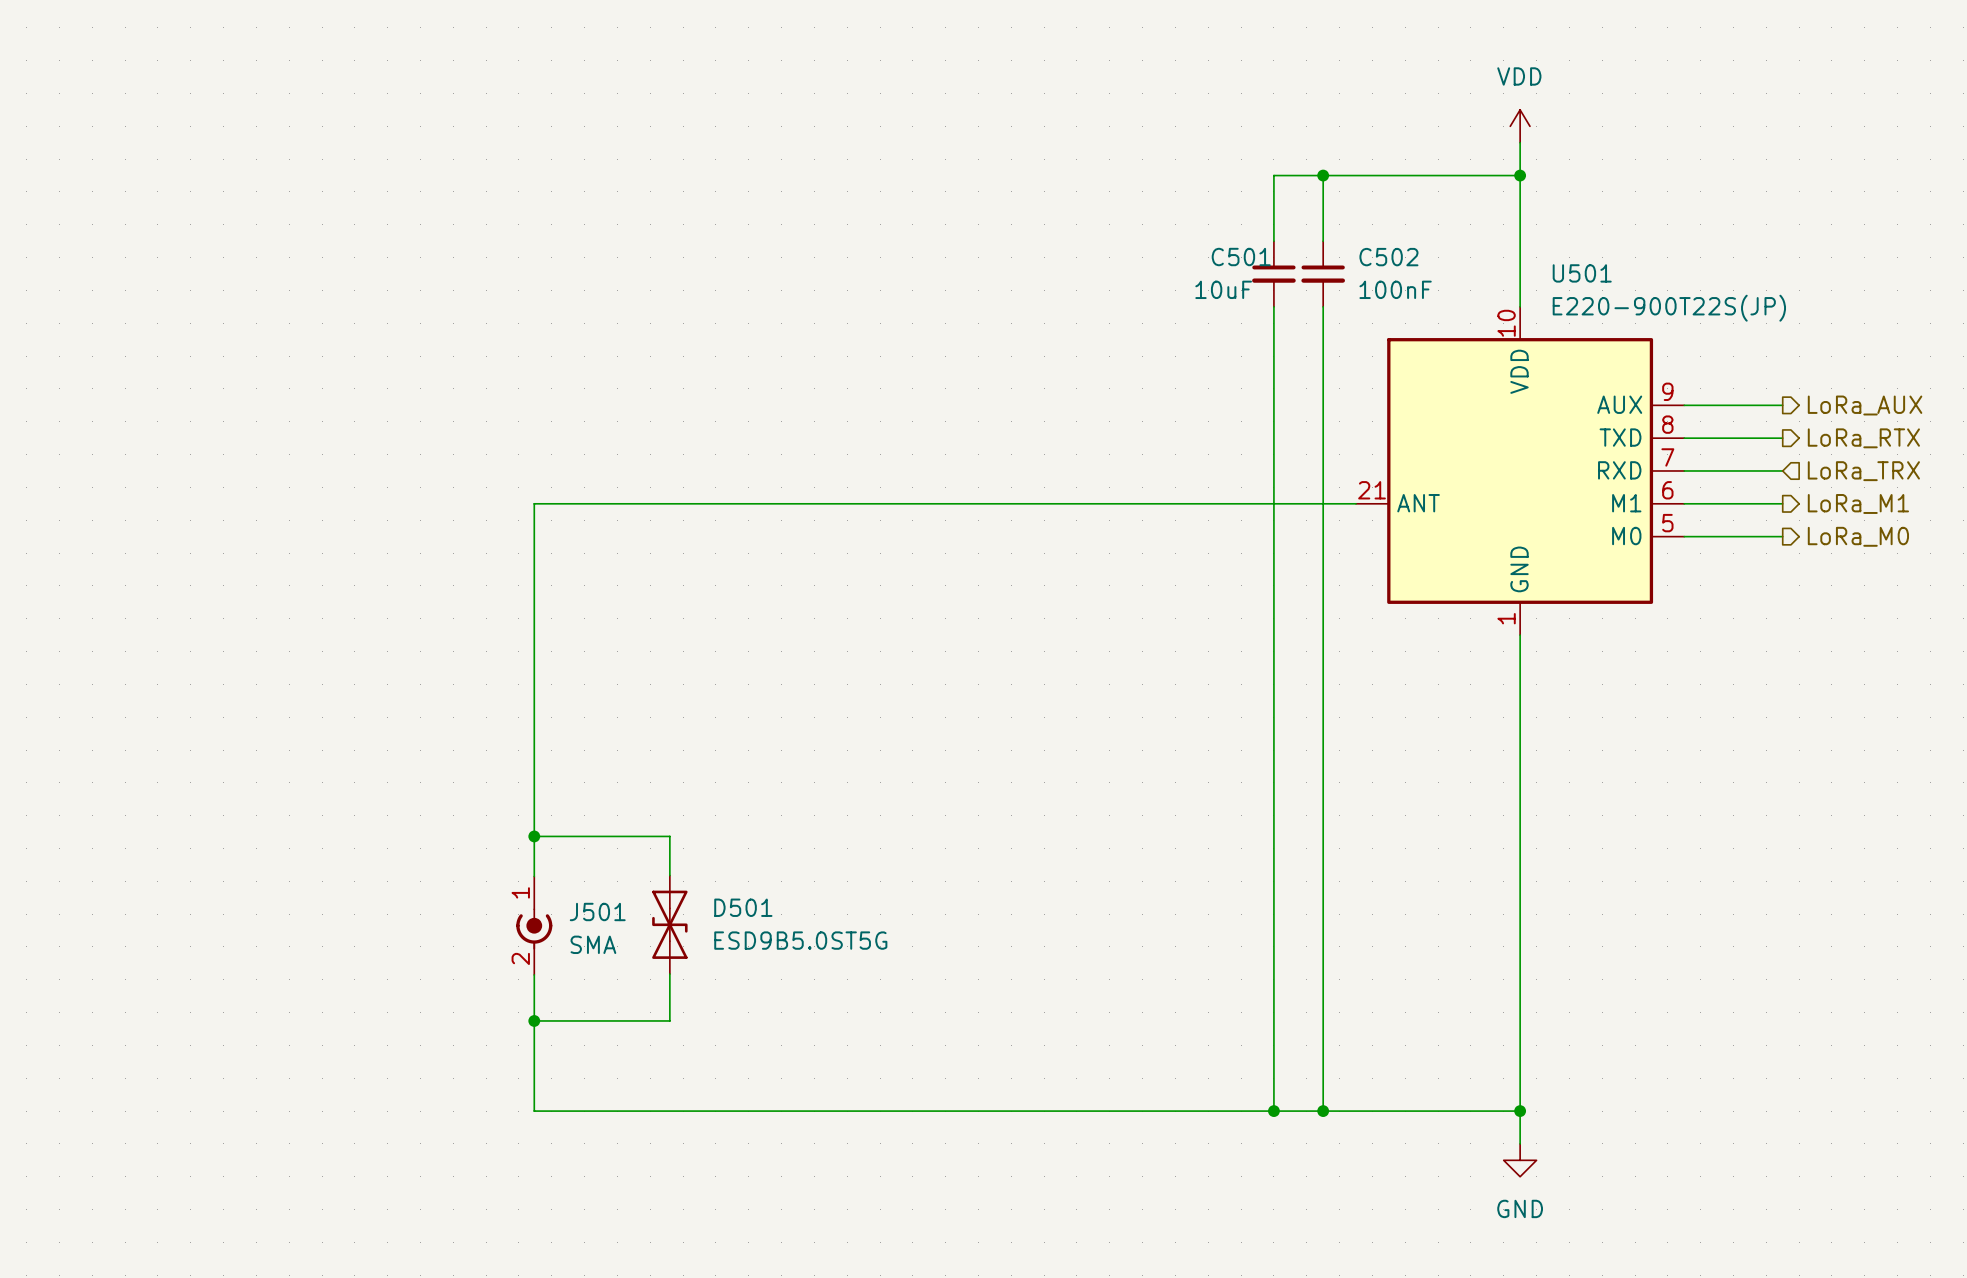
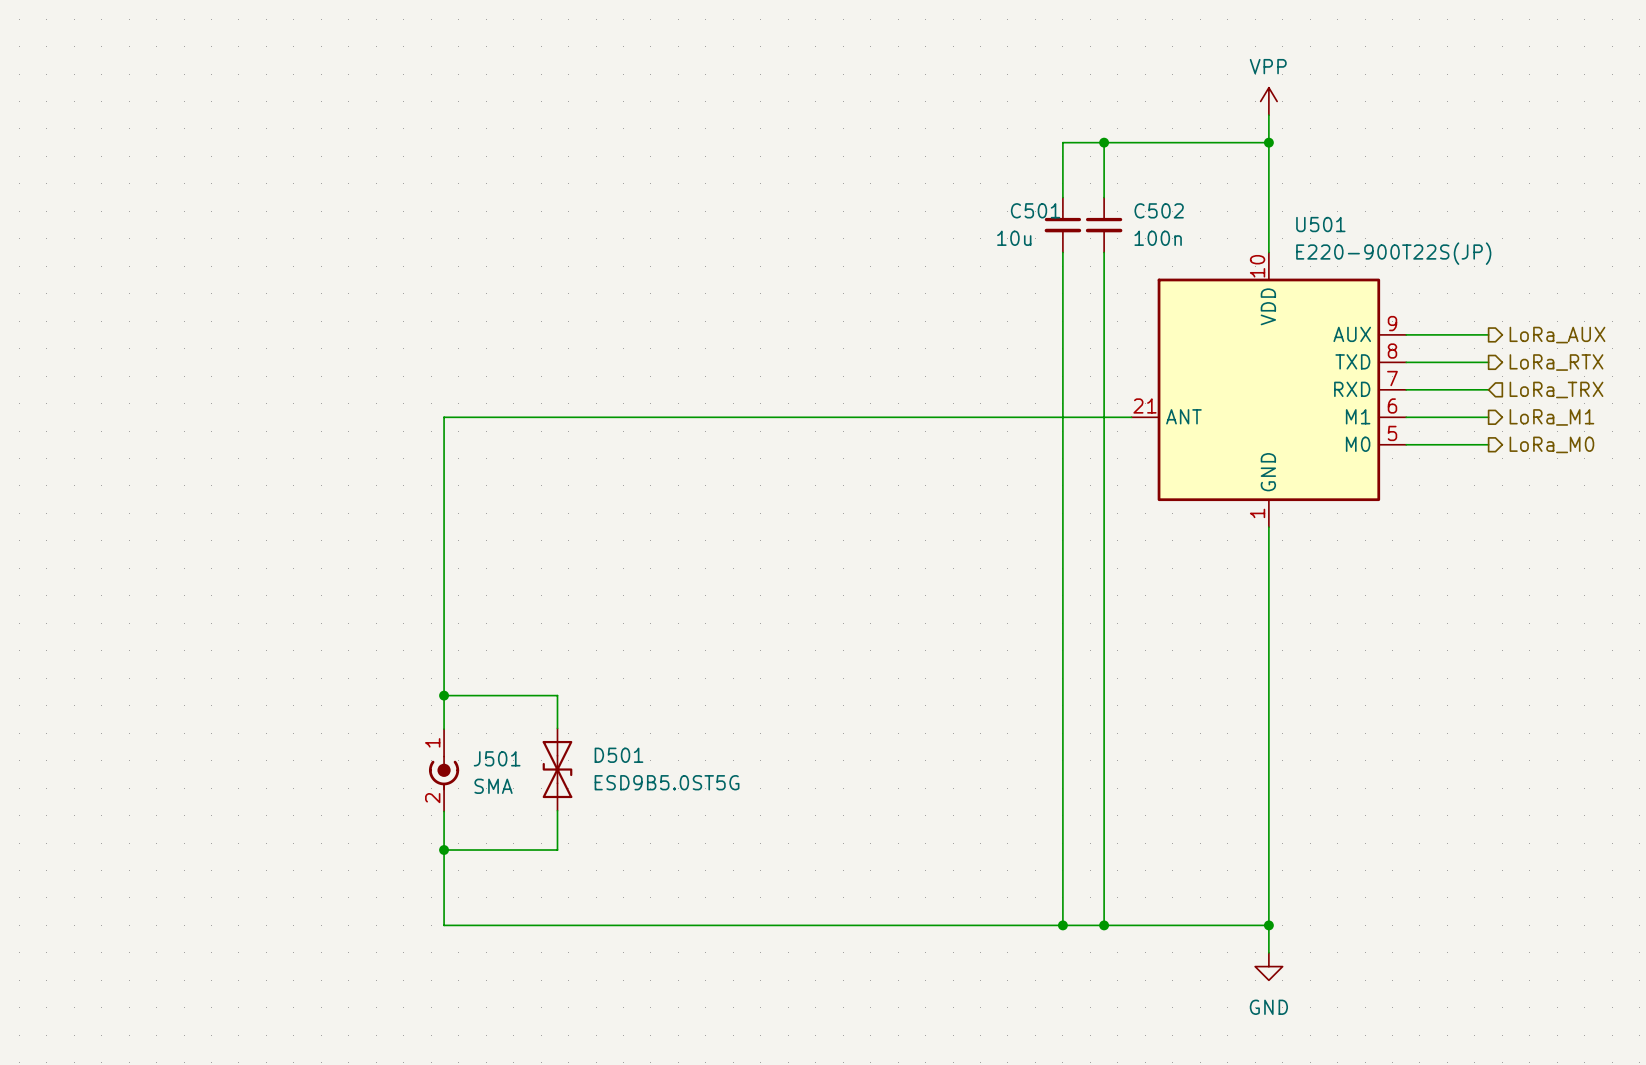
power symbol: VDD (1520, 126) -> VPP (1268, 101)
C501 value: 10uF (1223, 289) -> 10u (1014, 238)
C502 value: 100nF (1395, 289) -> 100n (1158, 238)

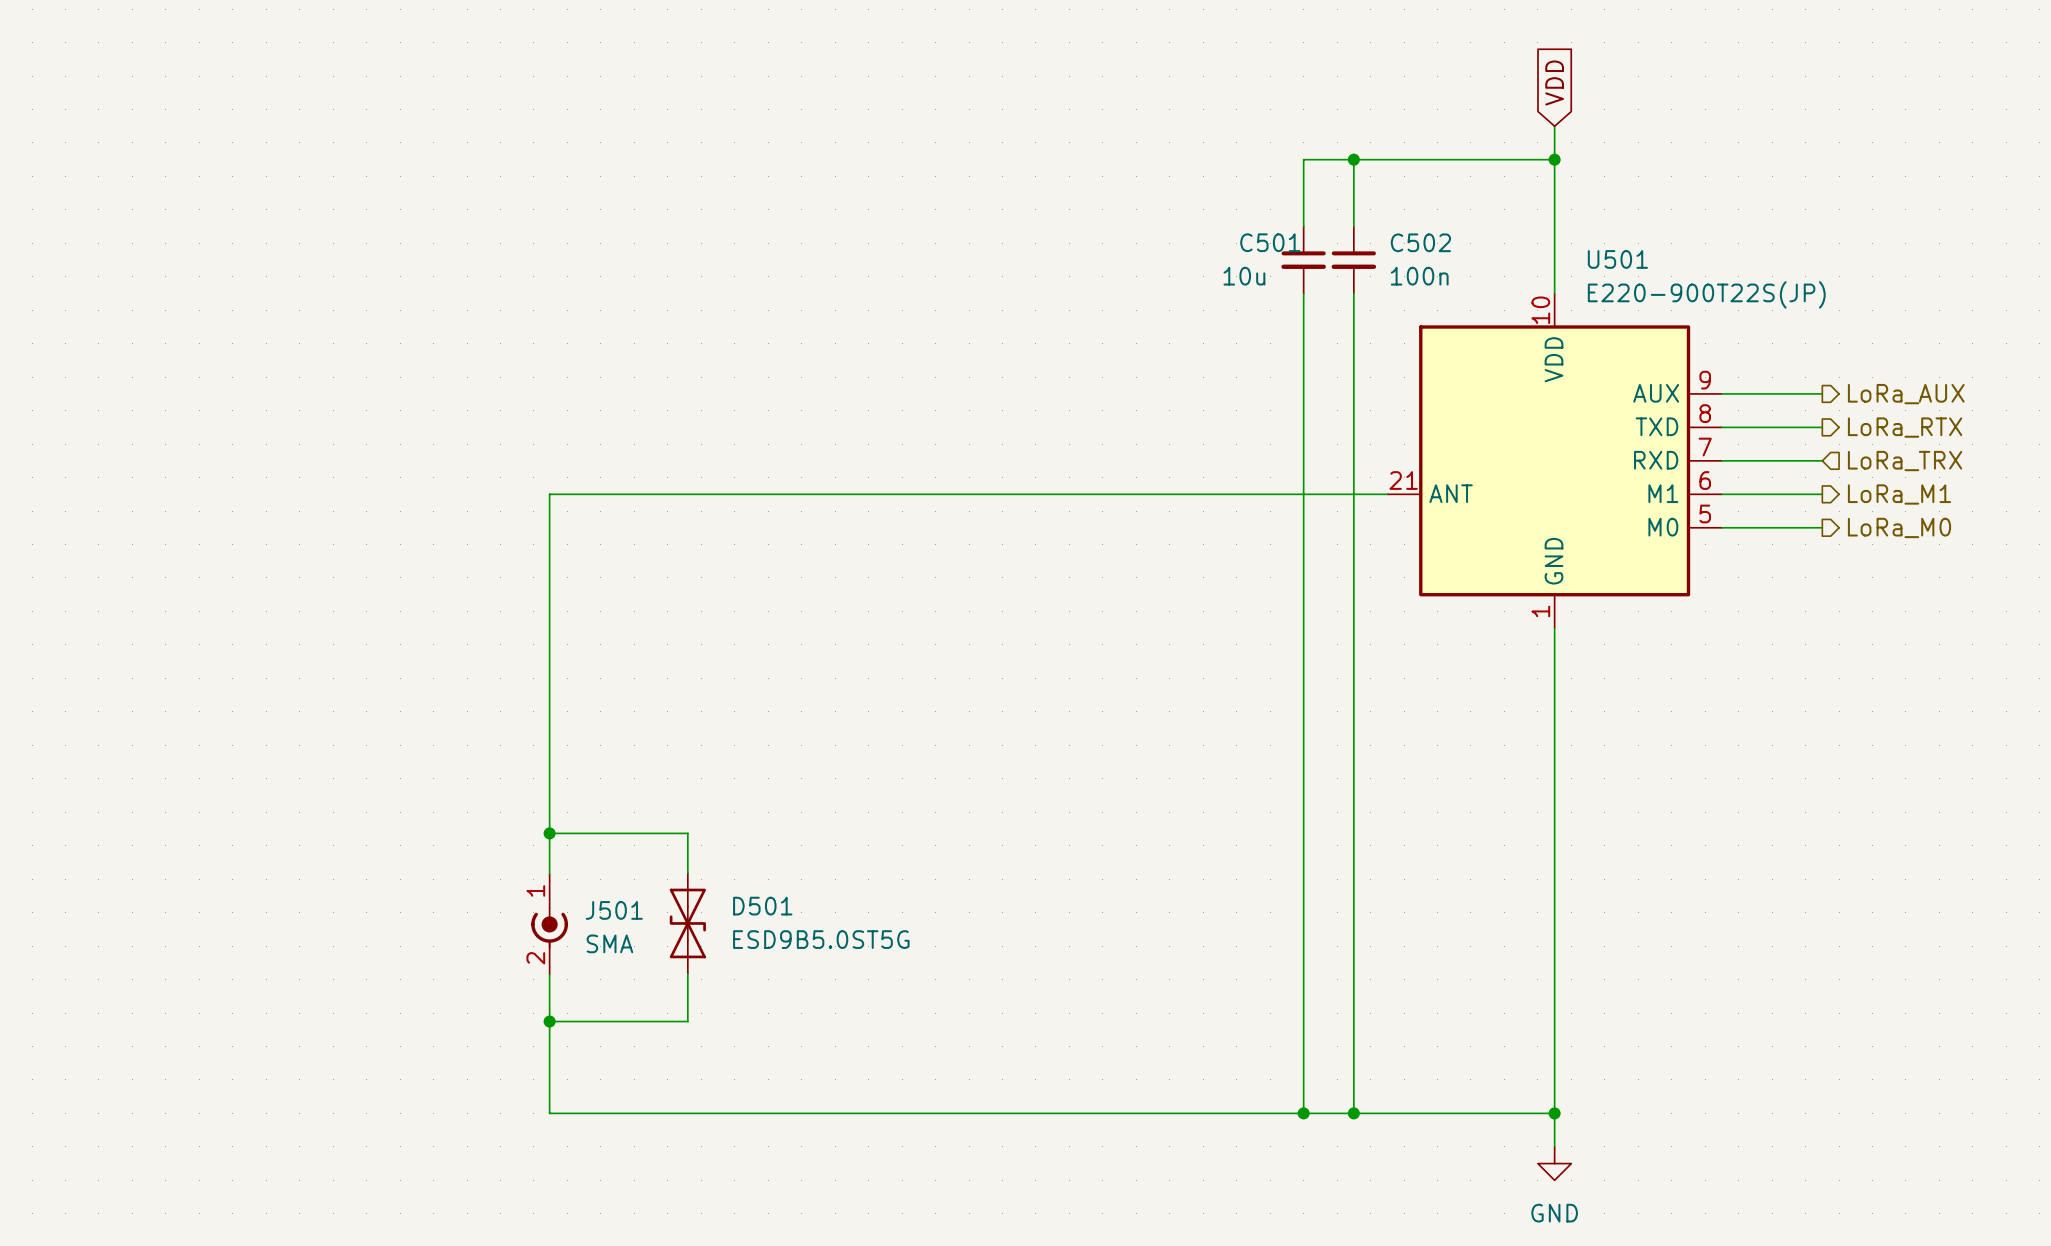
global label: none -> VDD (1554, 82)
power symbol: VPP (1268, 101) -> none

